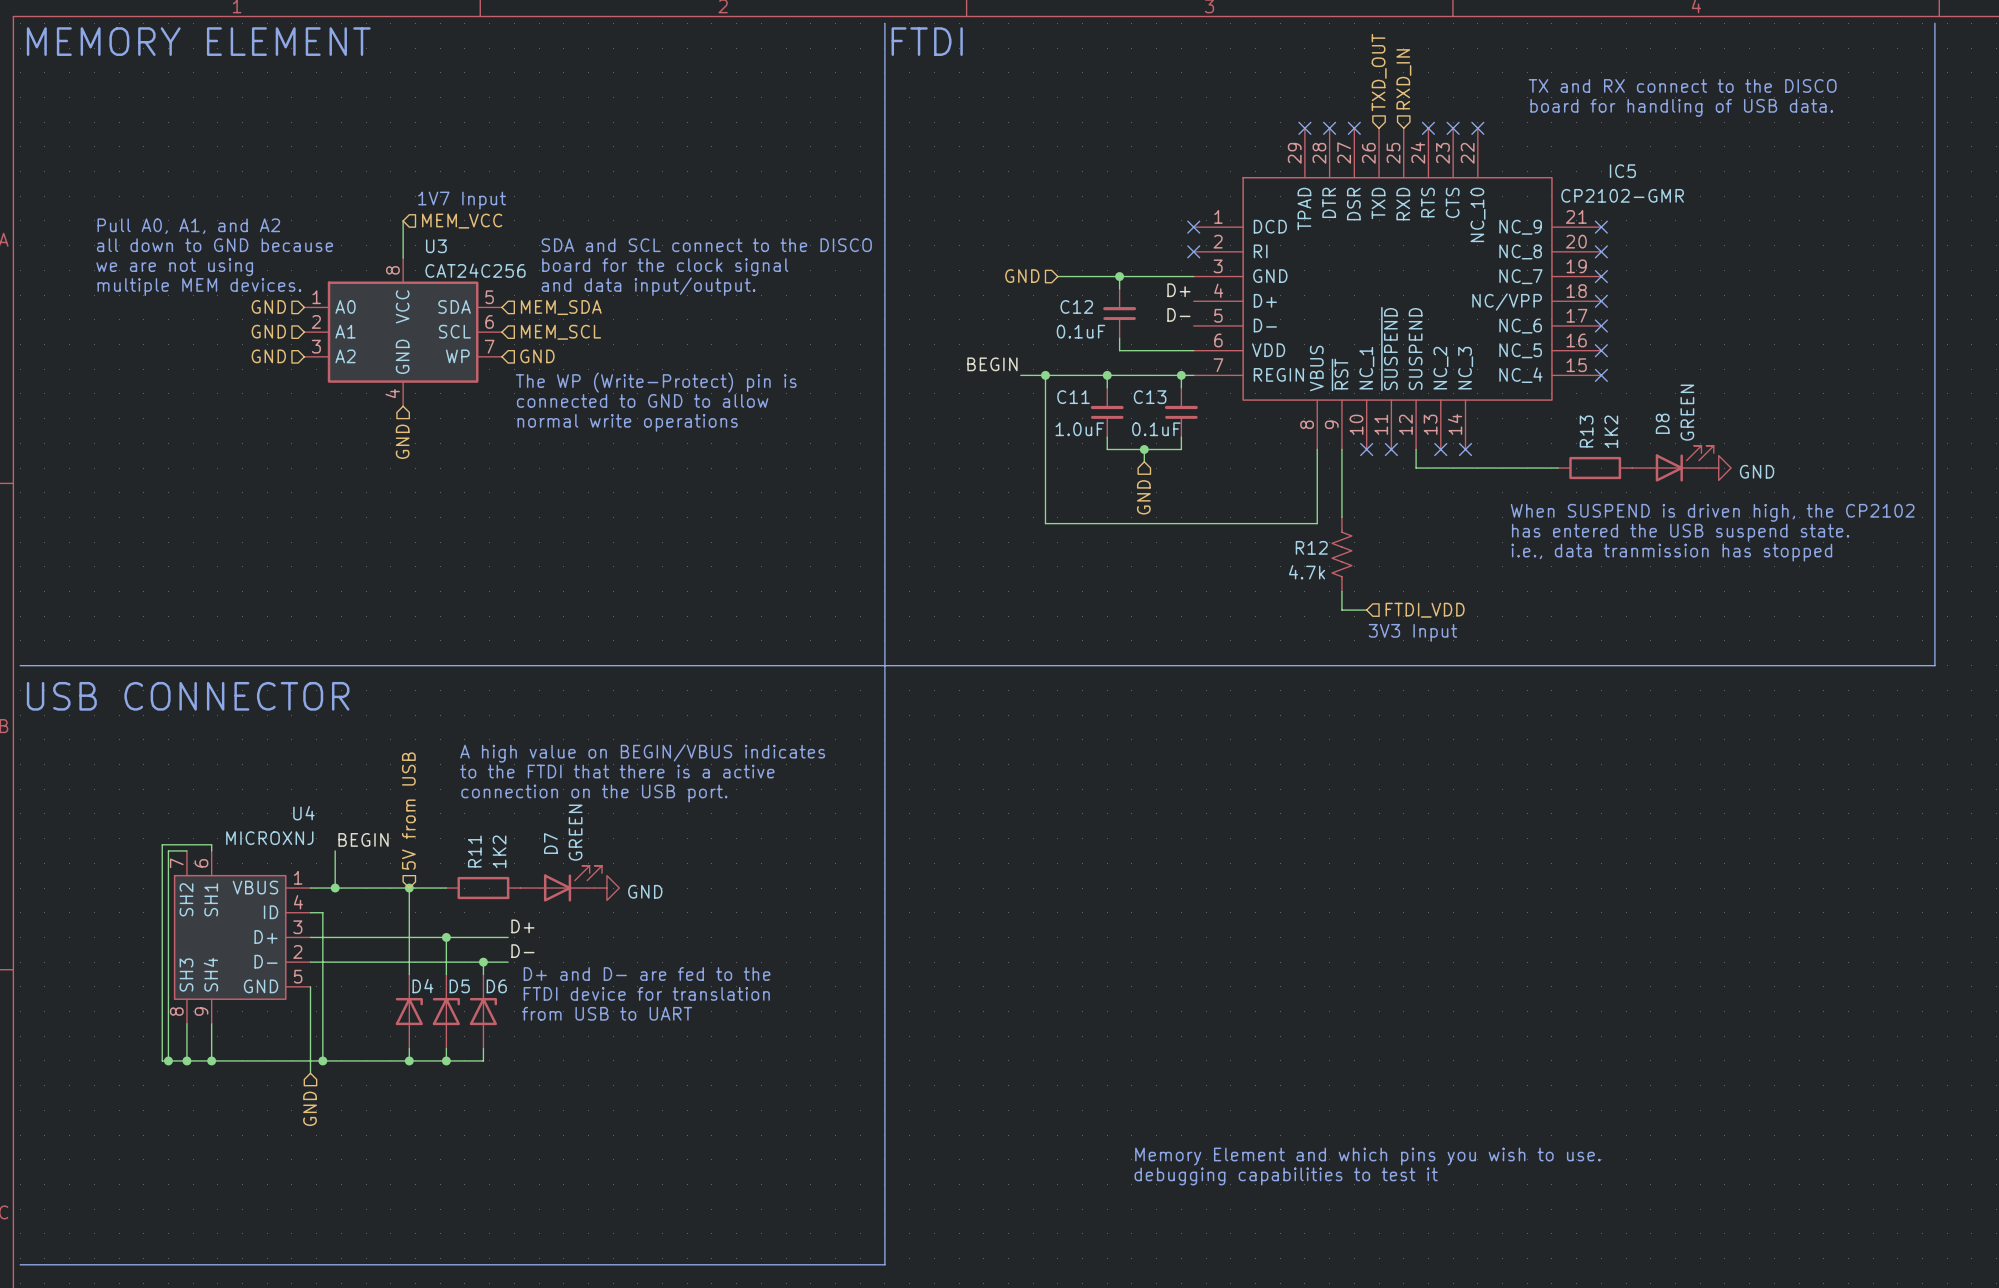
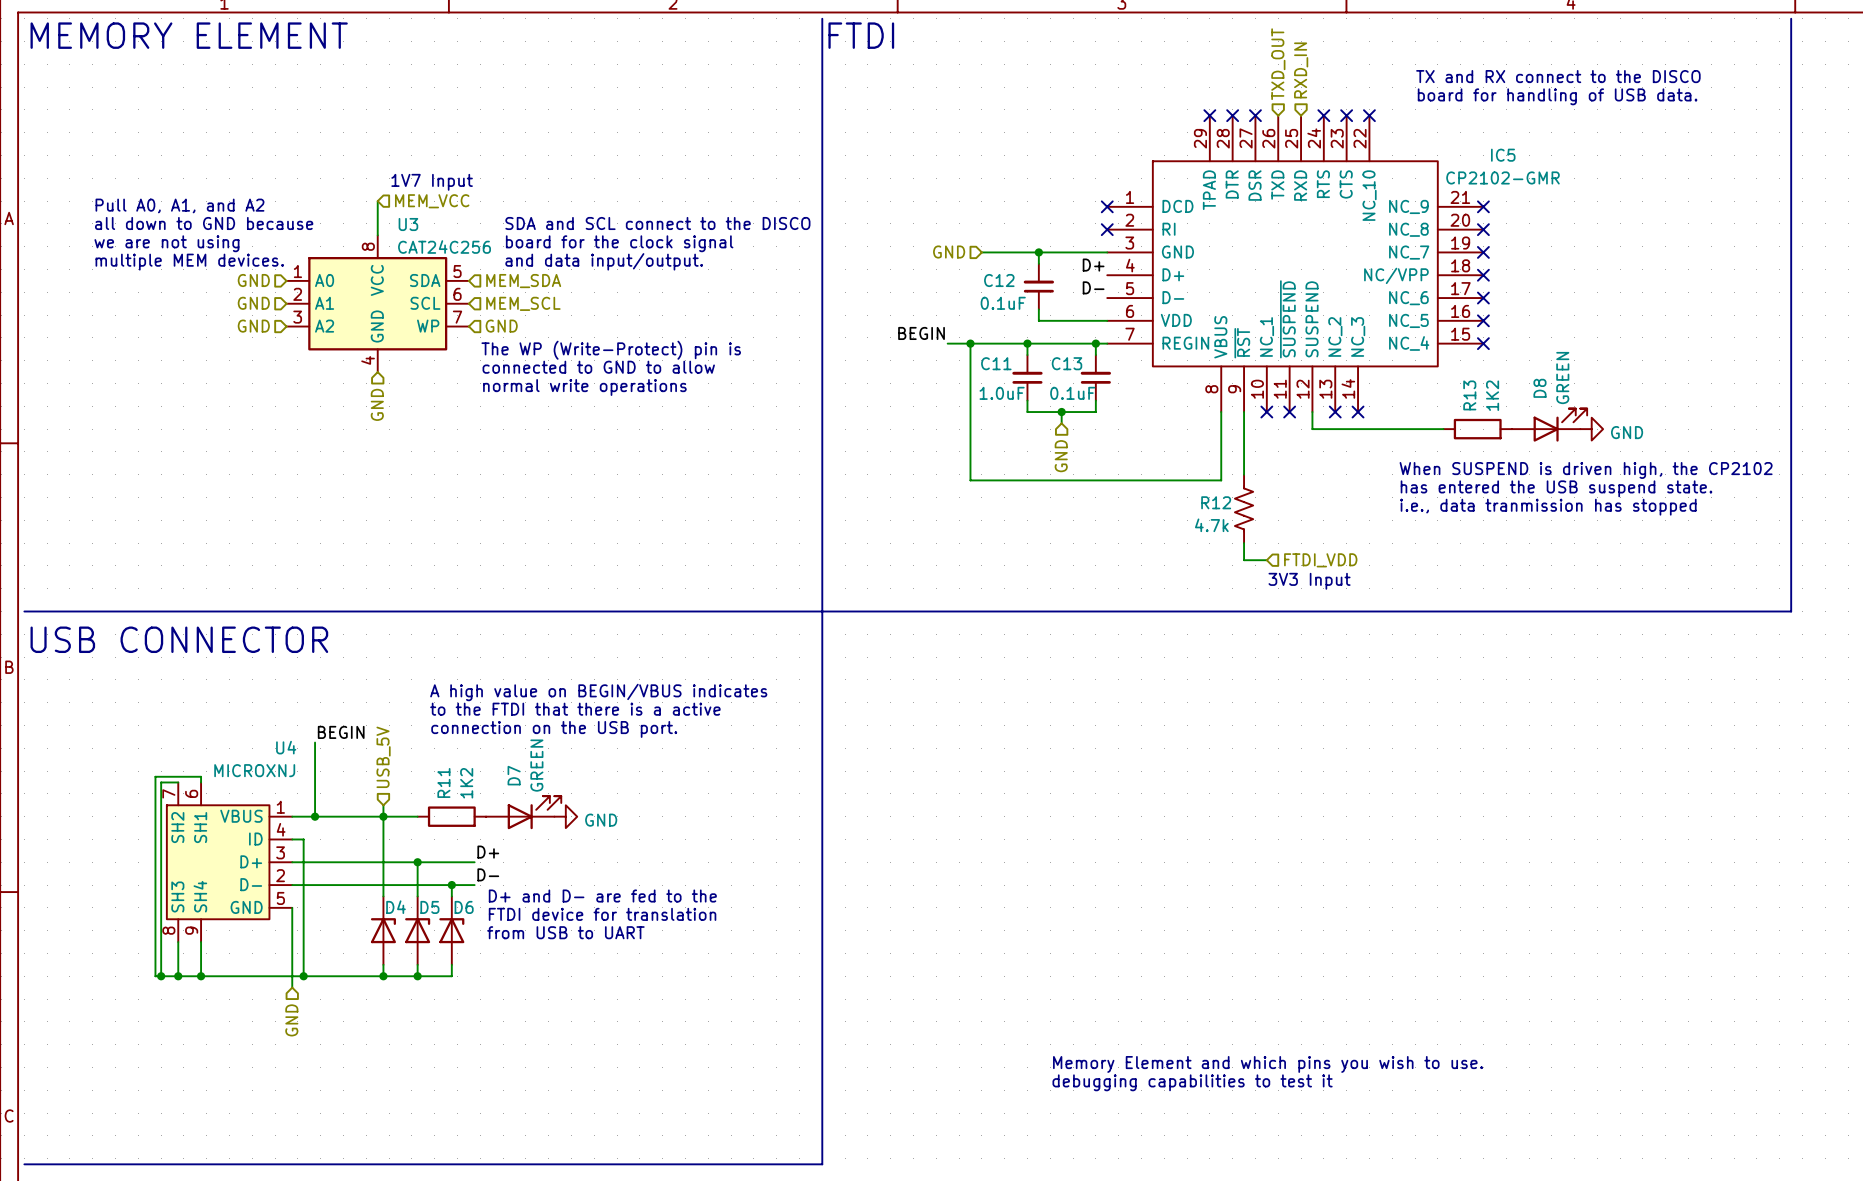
wire: none -> (315, 742) (315, 782)
hierarchical label: 5V from USB (408, 811) -> none
hierarchical label: none -> USB_5V (383, 757)
label position: BEGIN (363, 839) -> BEGIN (341, 732)

